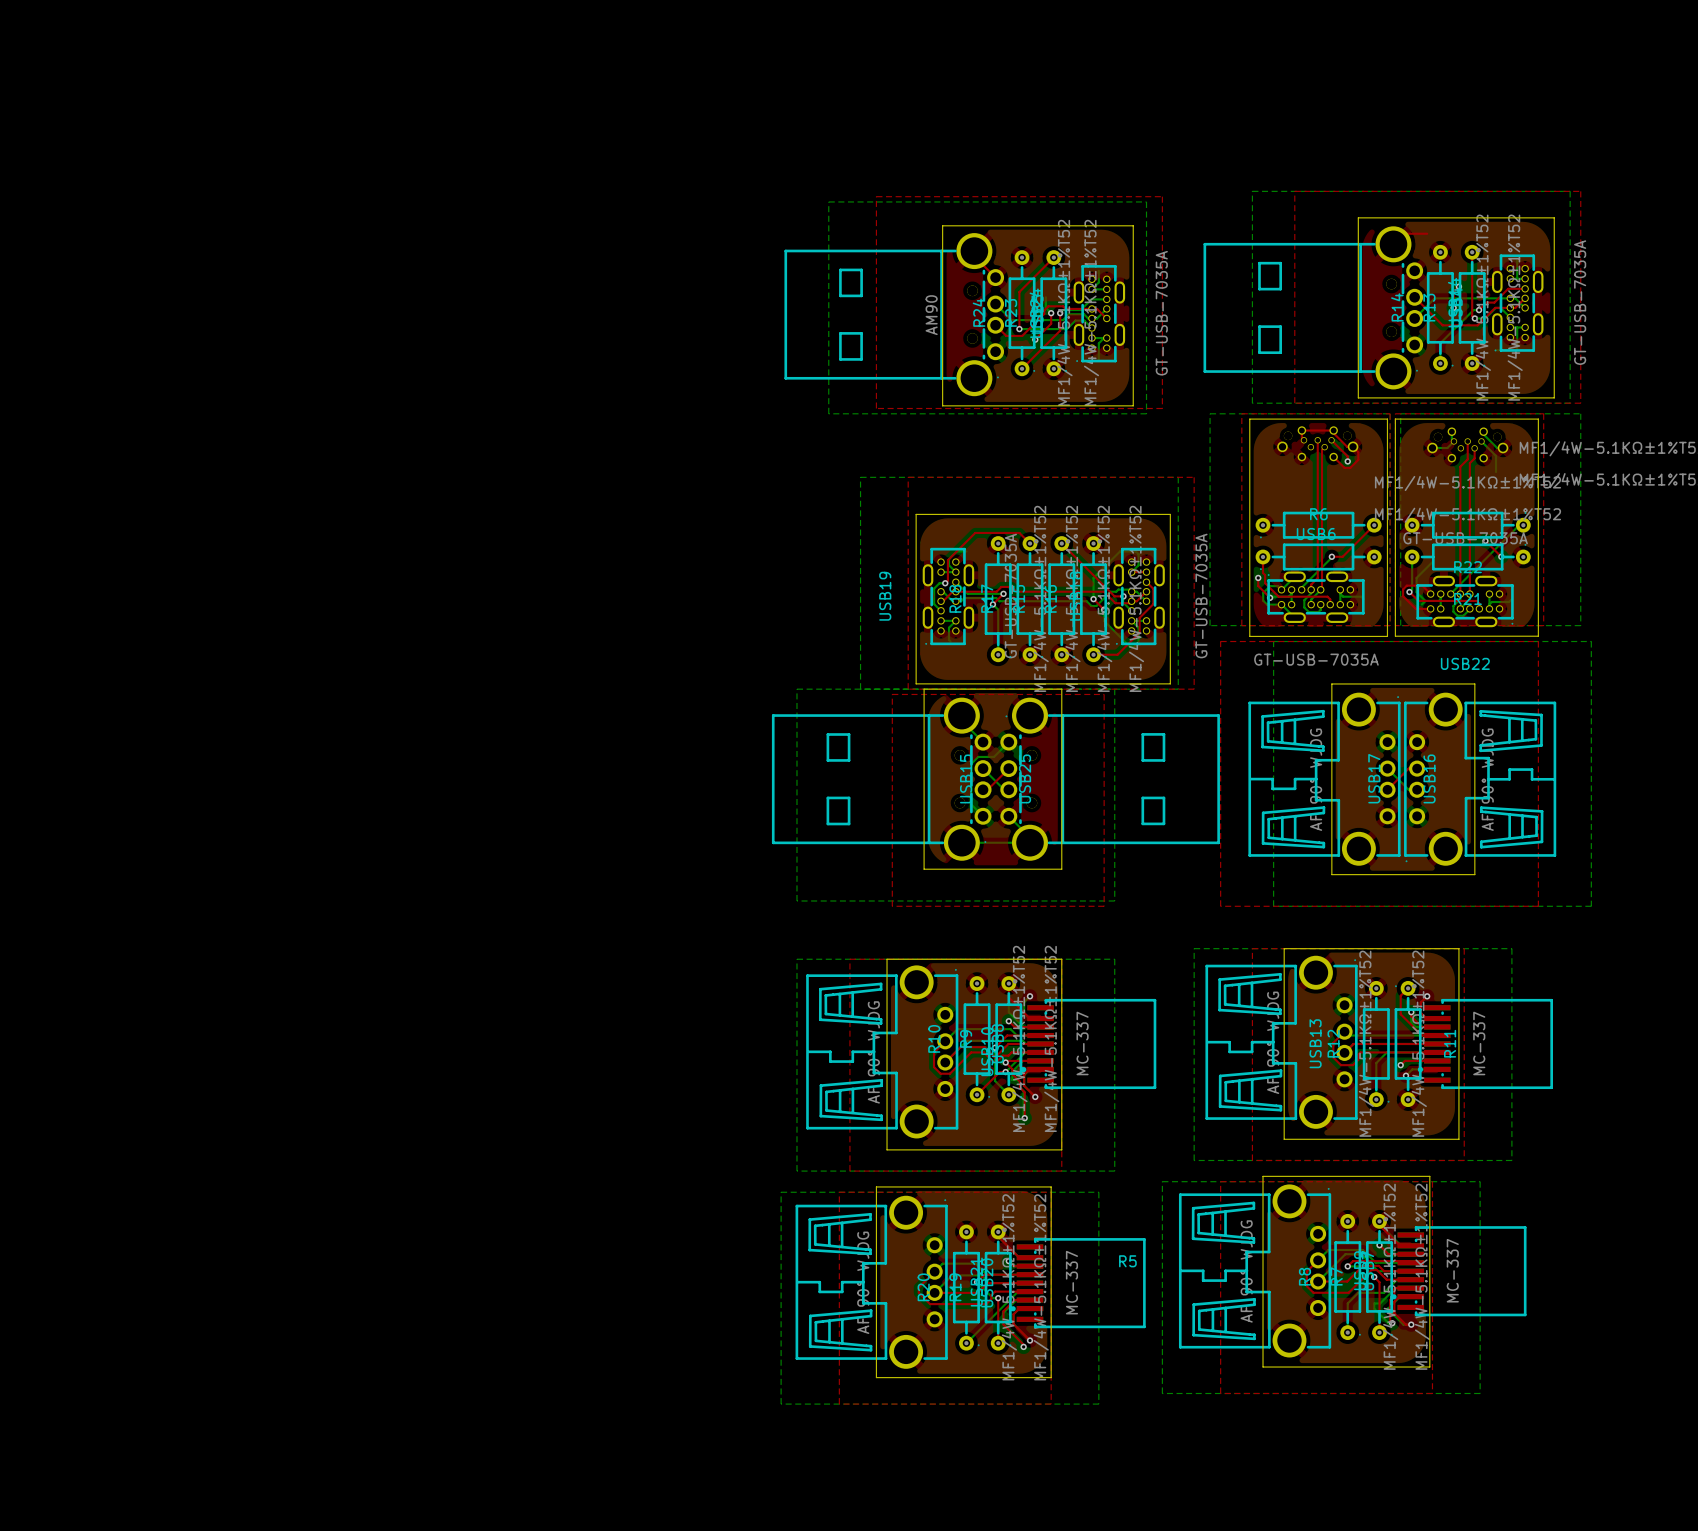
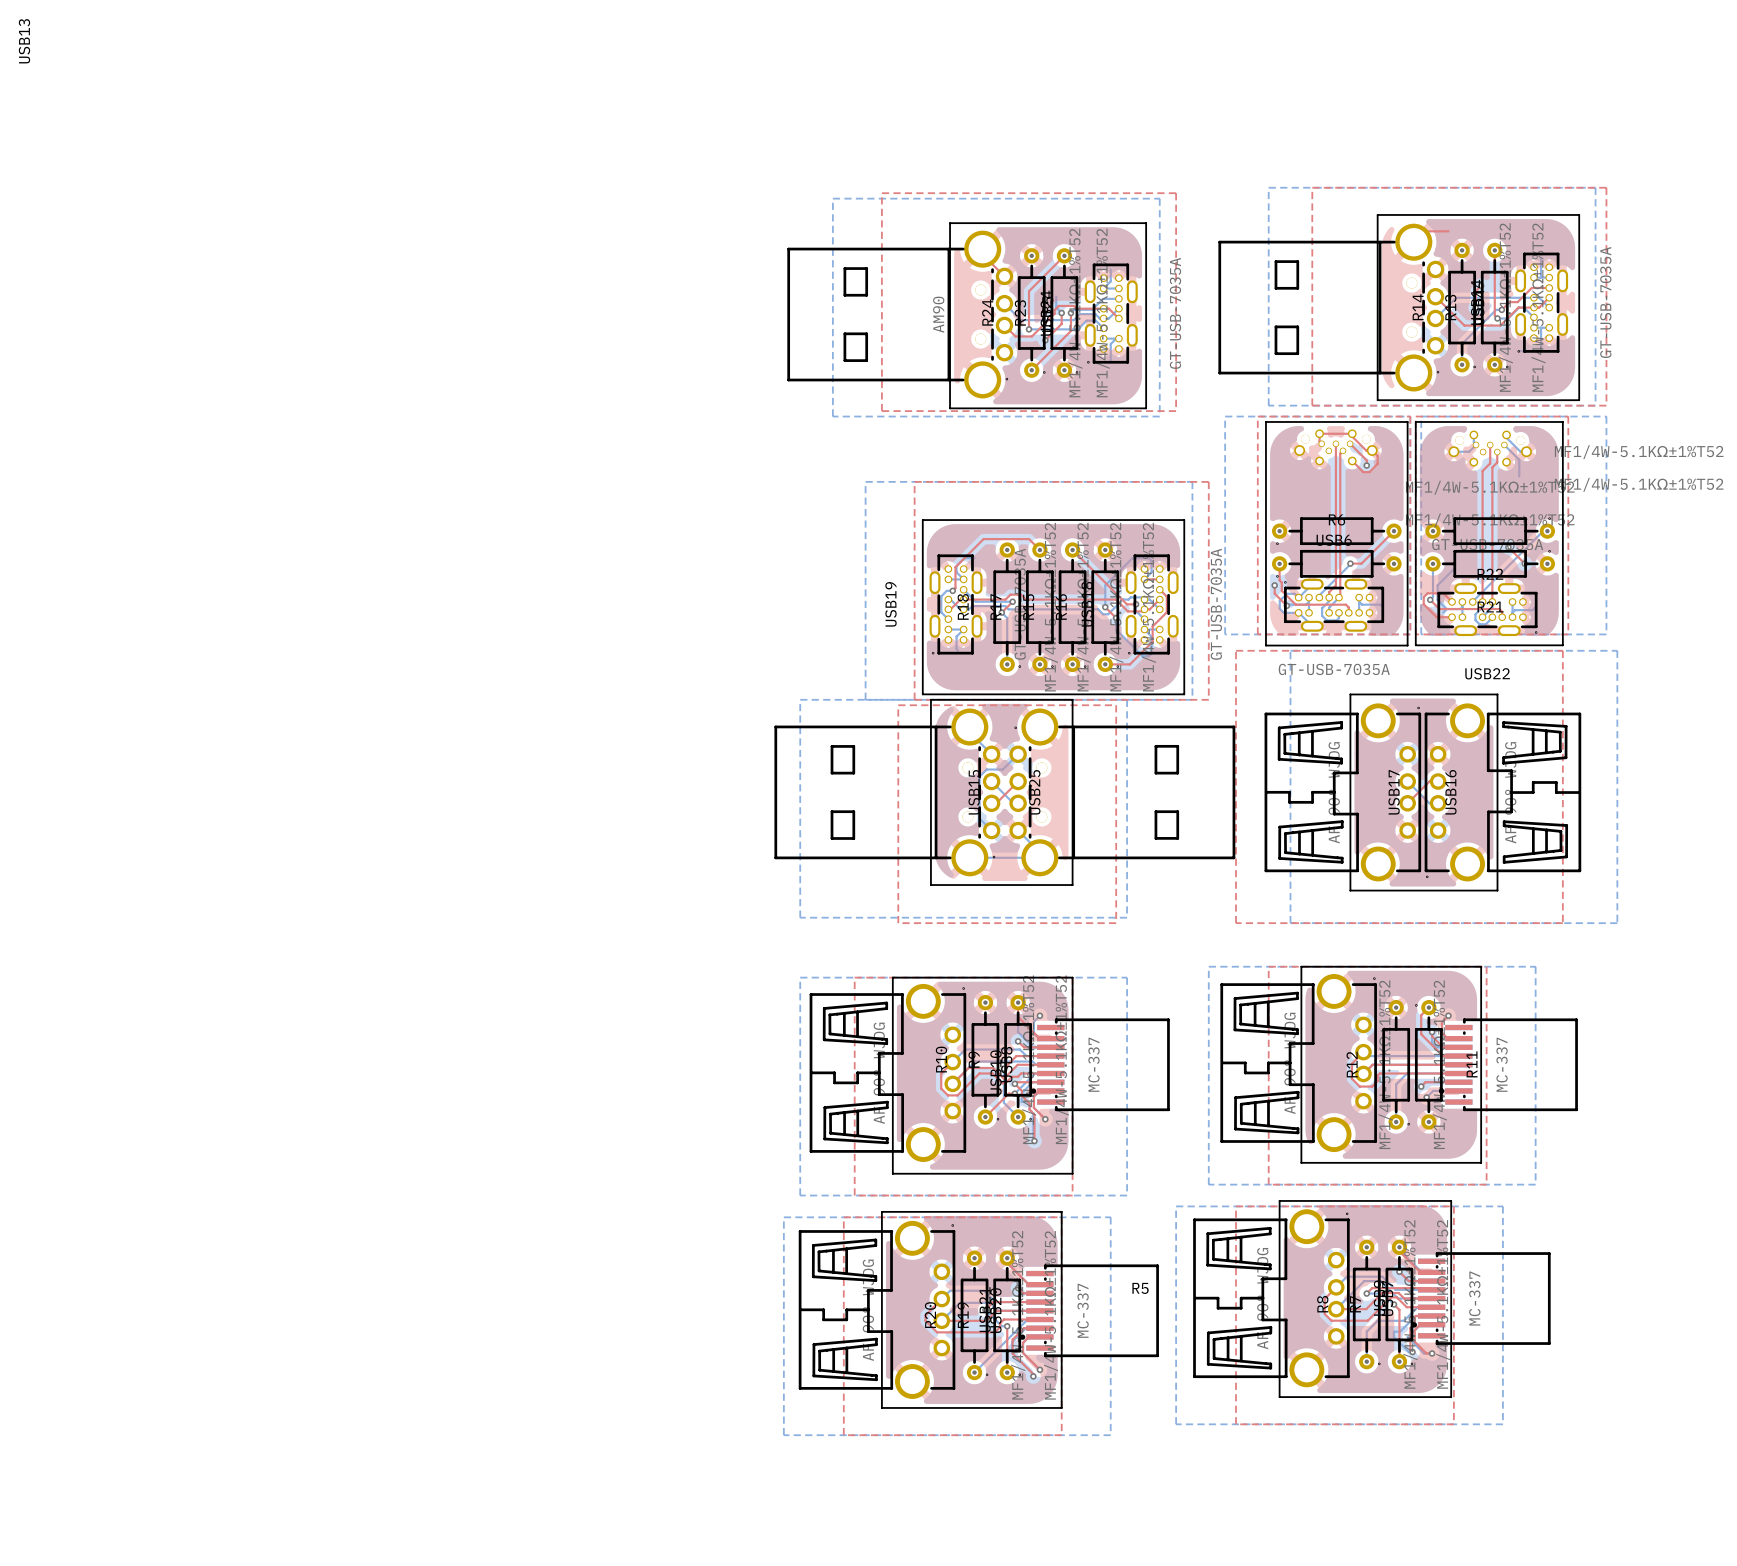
USB13 name position: USB13 (1315, 1043) -> USB13 (24, 41)

